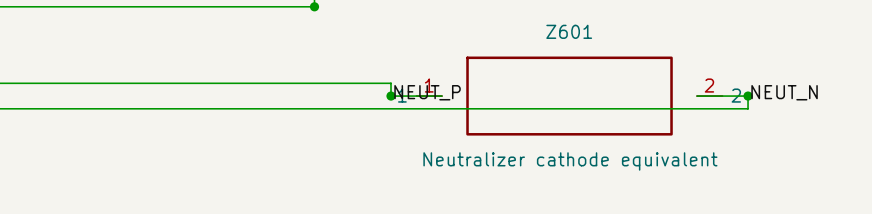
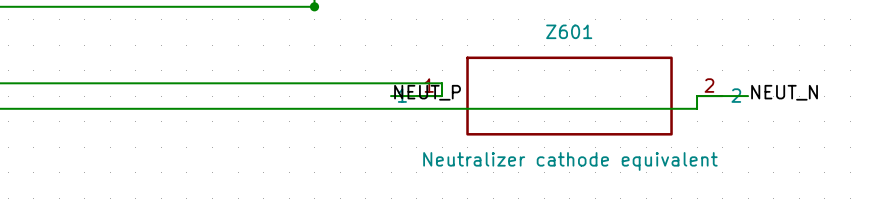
wire: (391, 83) (391, 96) -> (391, 83) (442, 83) (442, 96)
junction: (391, 96) -> none
wire: (748, 96) (748, 108) (697, 108) -> (697, 96) (697, 108)
junction: (748, 96) -> none

